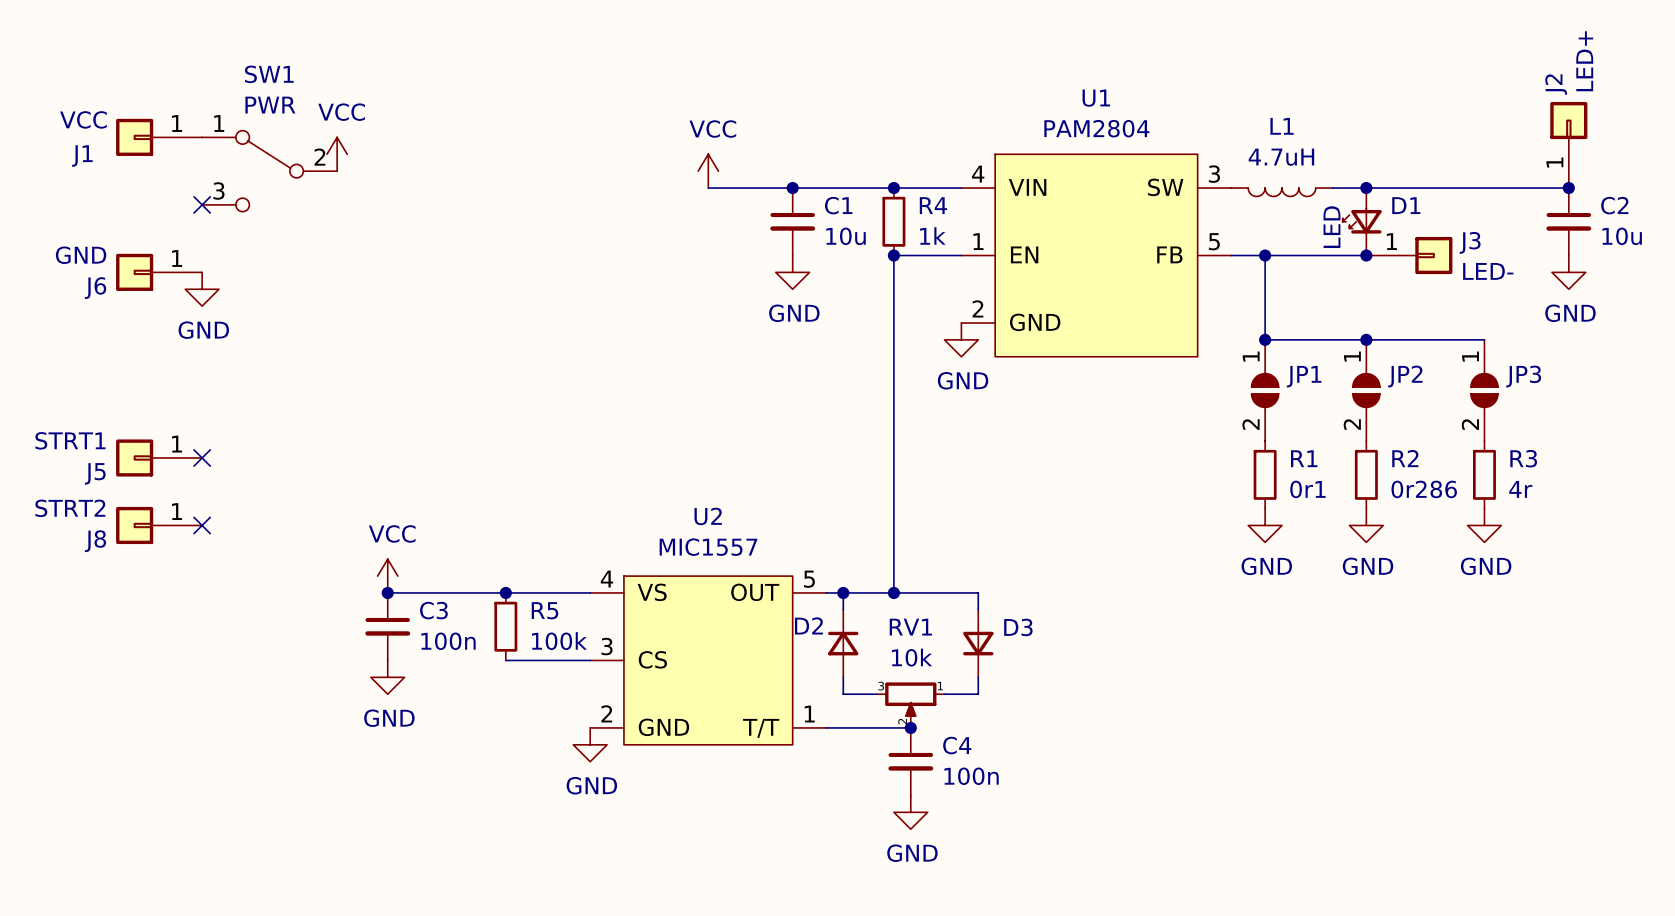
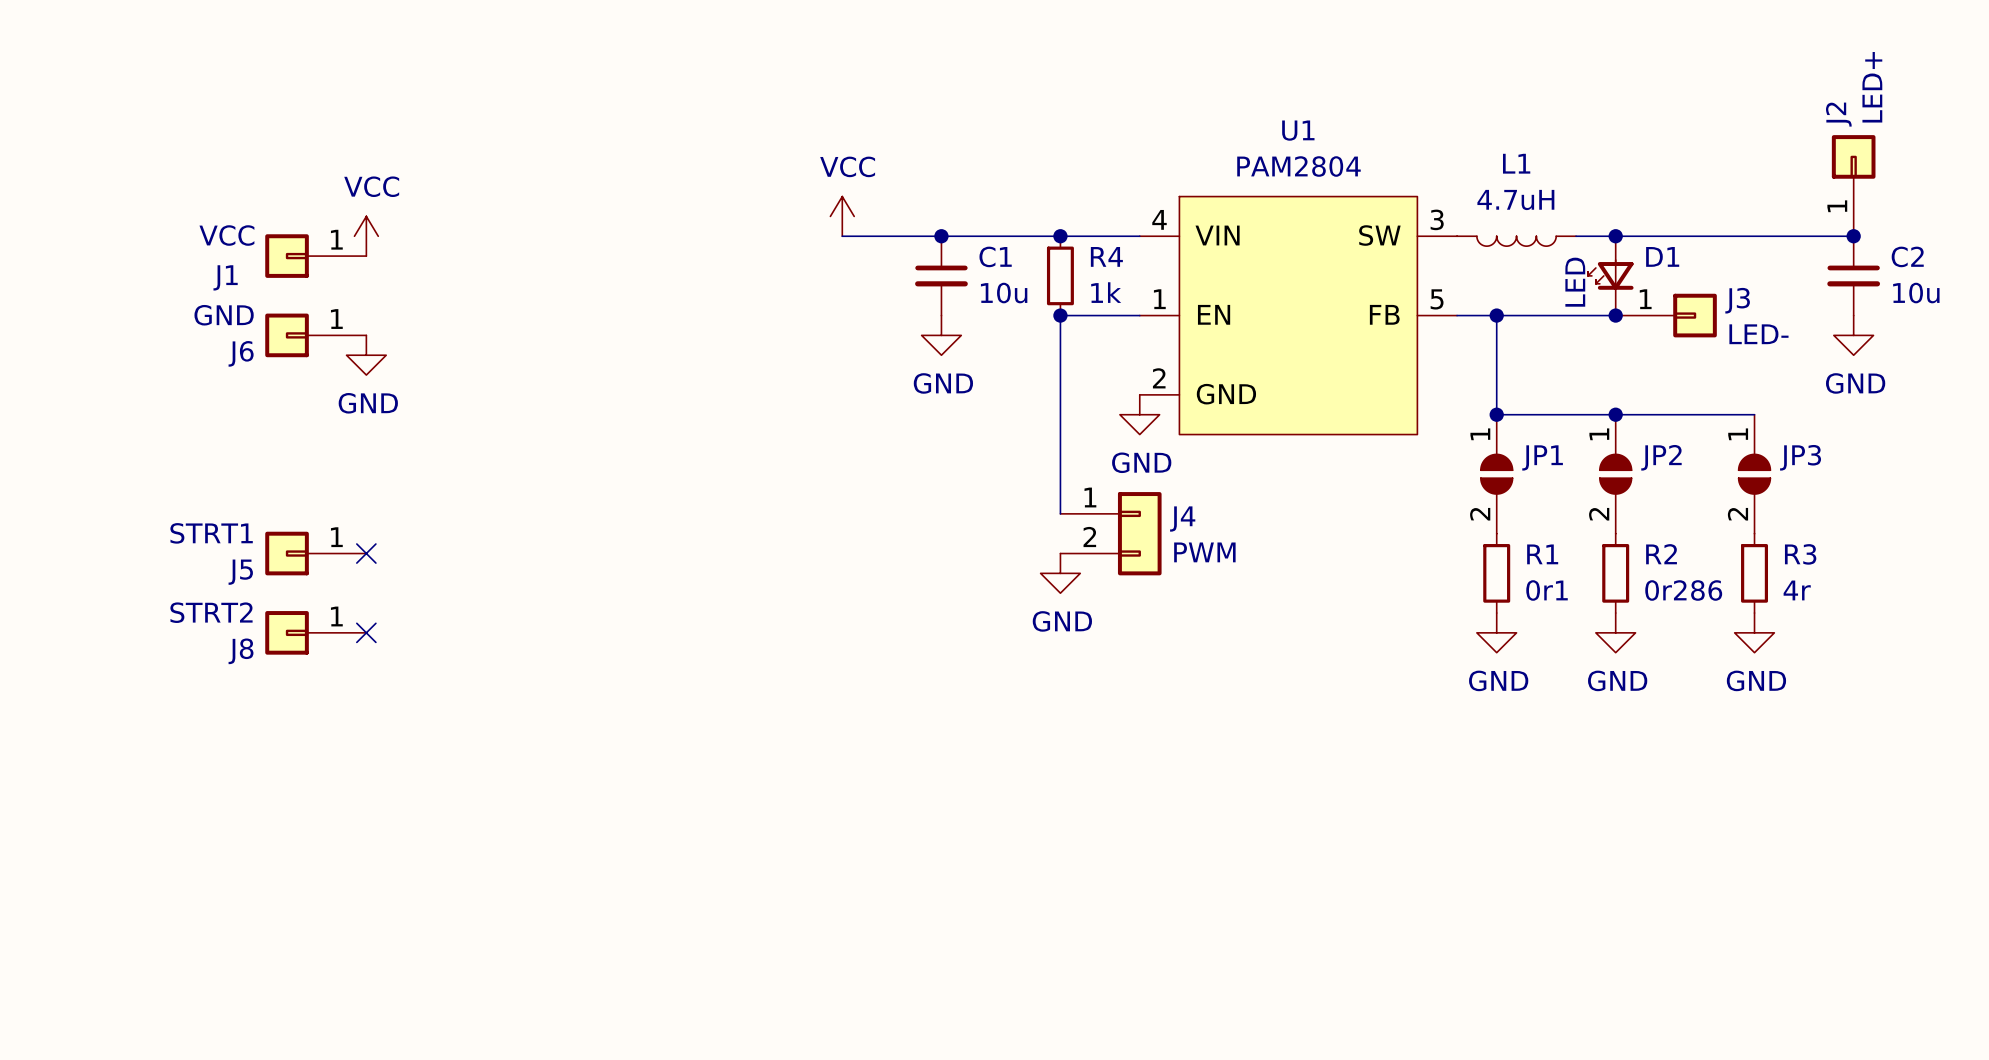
J1 position: (159, 137) -> (315, 256)
power symbol position: VCC (337, 154) -> VCC (366, 236)
SW1: PWR (269, 171) -> none
no-connect mark: (202, 204) -> none
J6 position: (159, 272) -> (315, 335)
power symbol position: GND (202, 289) -> GND (366, 355)
wire: (893, 424) (893, 592) -> none
J4: none -> PWM (1111, 533)
J5 position: (159, 457) -> (315, 553)
no-connect mark: (202, 457) -> none
no-connect mark: none -> (366, 553)
power symbol: none -> GND (1060, 573)
J8 position: (159, 525) -> (315, 632)
no-connect mark: (202, 525) -> none
no-connect mark: none -> (366, 632)
power symbol: VCC (387, 576) -> none
wire: (387, 592) (590, 592) -> none
junction: (387, 592) -> none
junction: (505, 592) -> none
wire: (826, 592) (978, 592) (978, 609) -> none
wire: (843, 592) (843, 609) -> none
junction: (843, 592) -> none
junction: (893, 592) -> none
C3: 100n (387, 626) -> none
R5: 100k (505, 626) -> none
D2: (843, 643) -> none
D3: (978, 643) -> none
wire: (505, 660) (590, 660) -> none
U2: MIC1557 (708, 660) -> none
power symbol: GND (387, 677) -> none
wire: (843, 677) (843, 694) (877, 694) -> none
wire: (978, 677) (978, 694) (944, 694) -> none
RV1: 10k (910, 705) -> none
wire: (826, 727) (910, 727) -> none
junction: (910, 727) -> none
power symbol: GND (590, 744) -> none
C4: 100n (910, 761) -> none
power symbol: GND (910, 812) -> none

